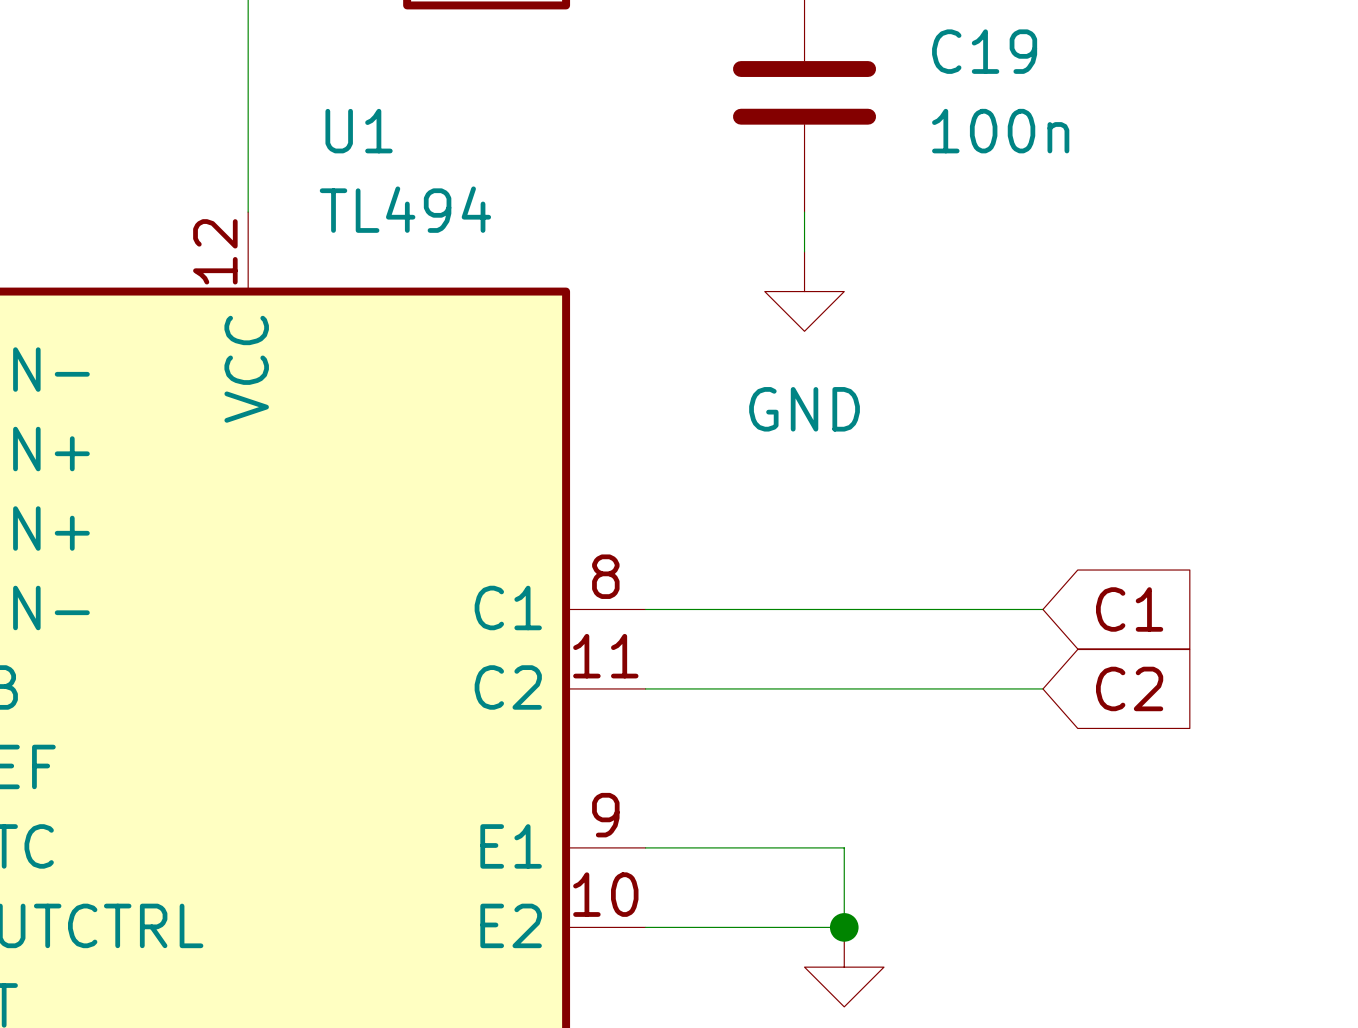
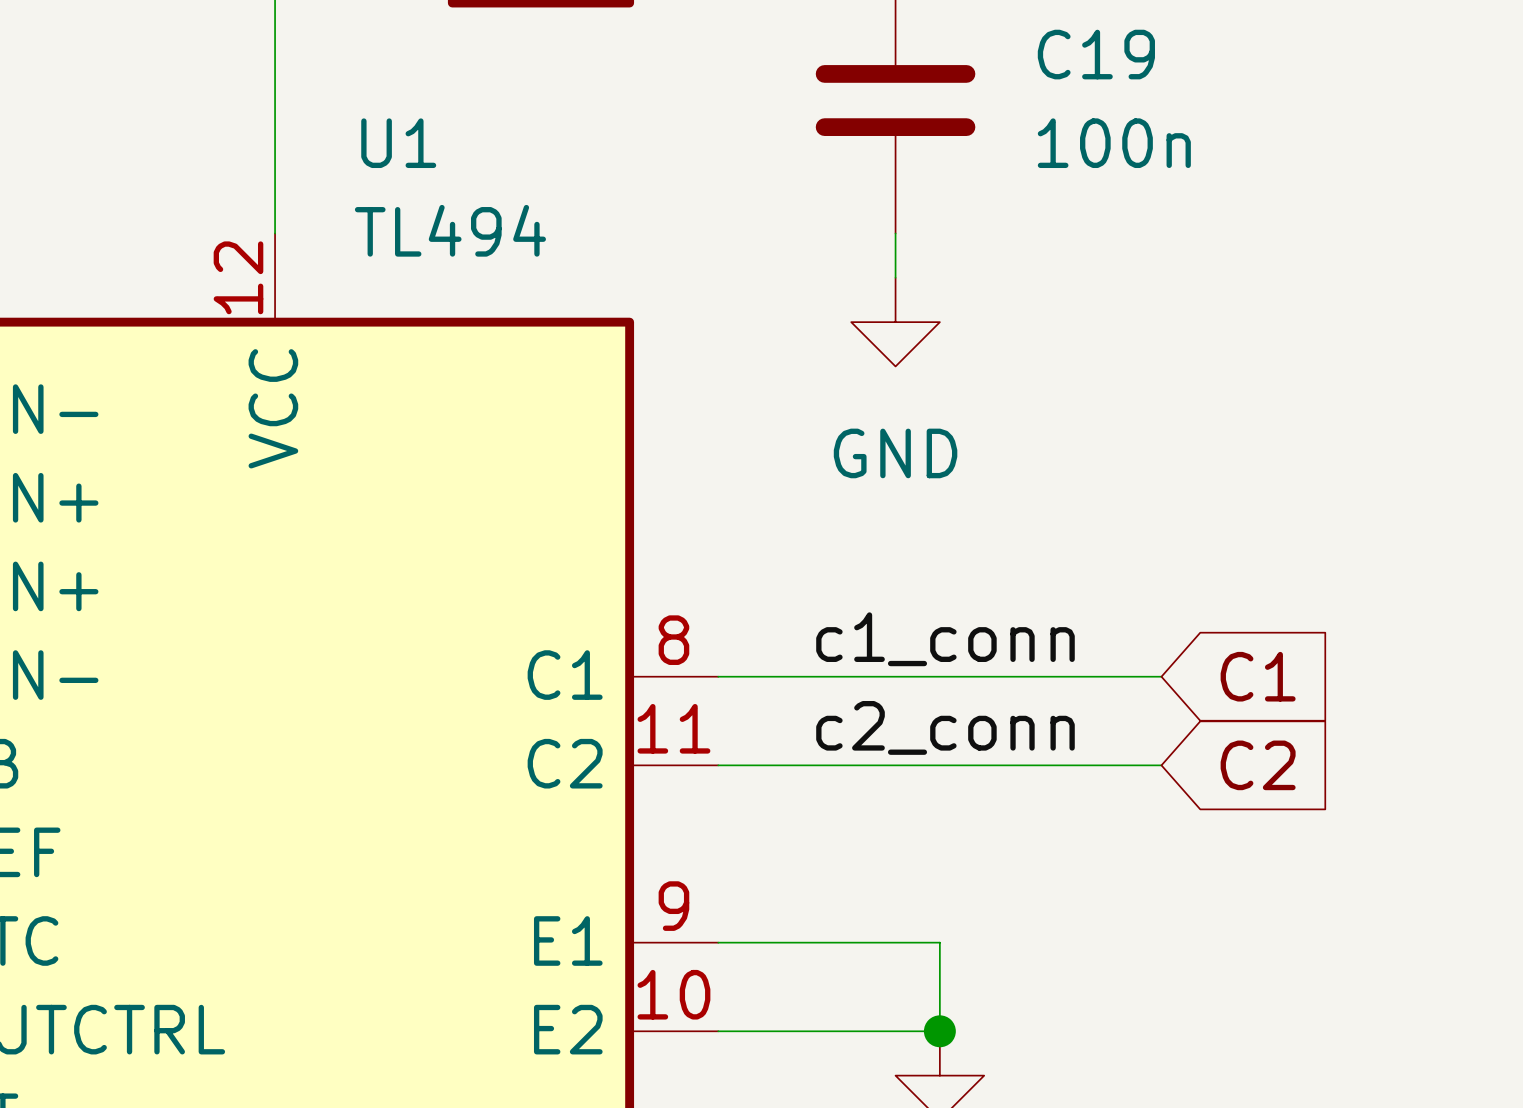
label: none -> c1_conn (945, 639)
label: none -> c2_conn (945, 727)

